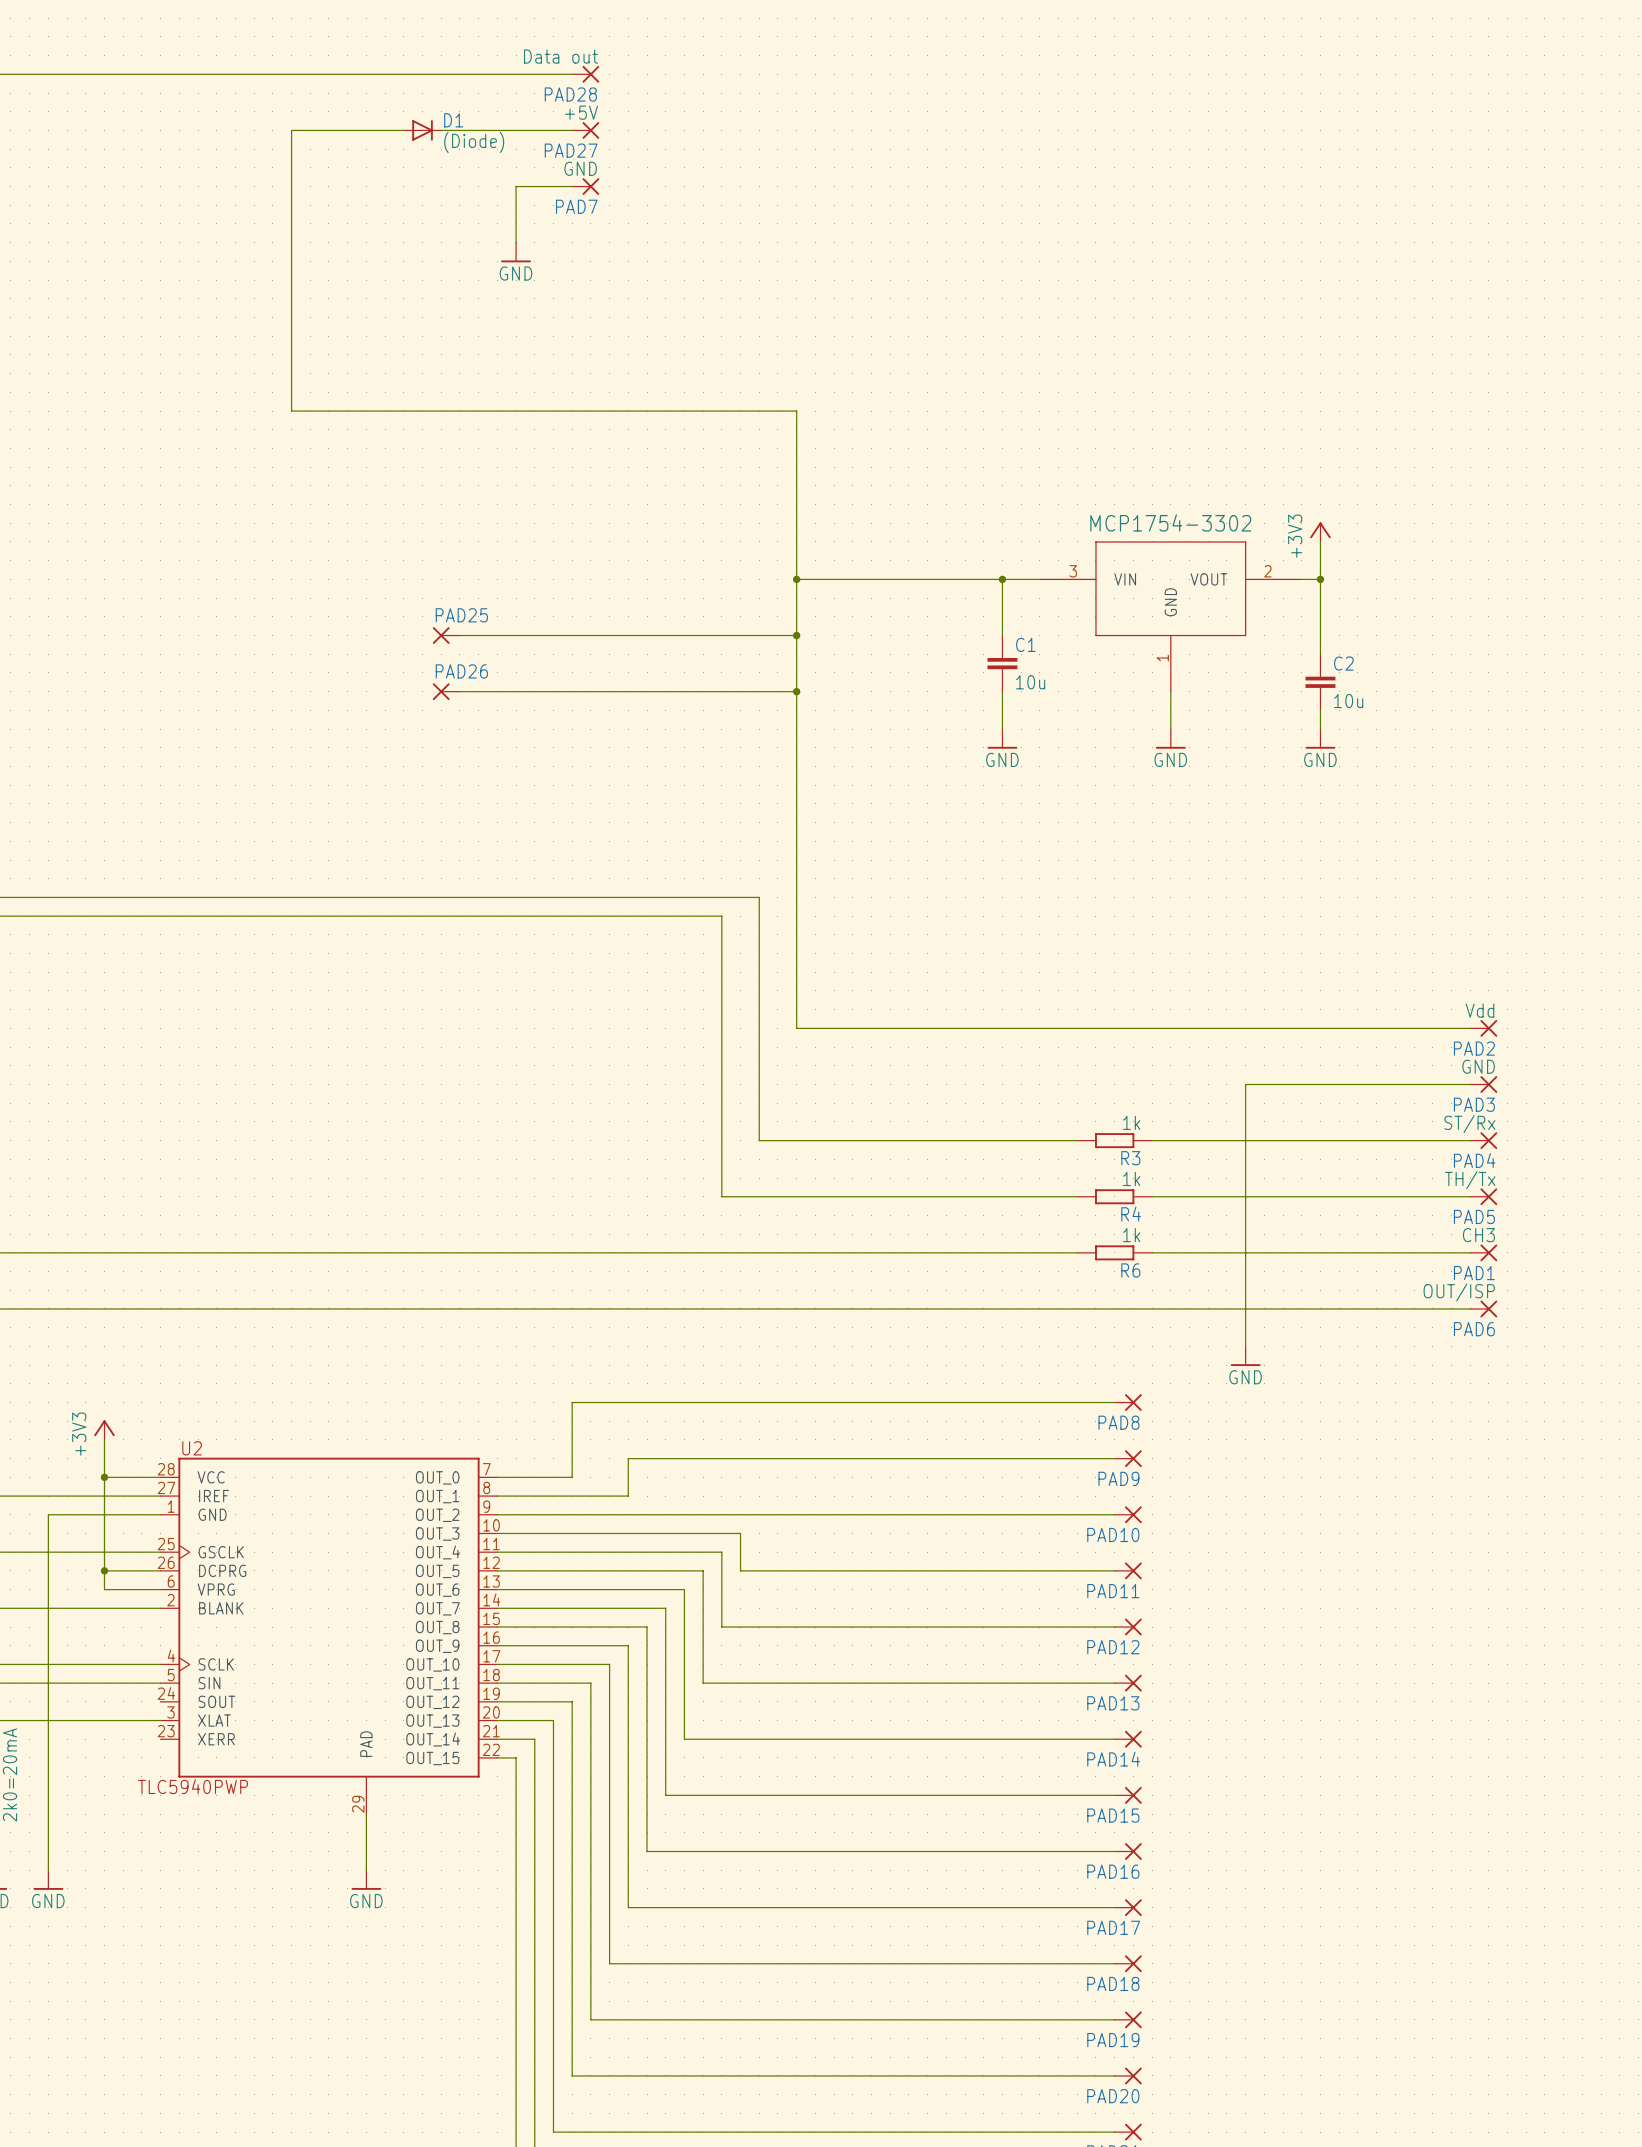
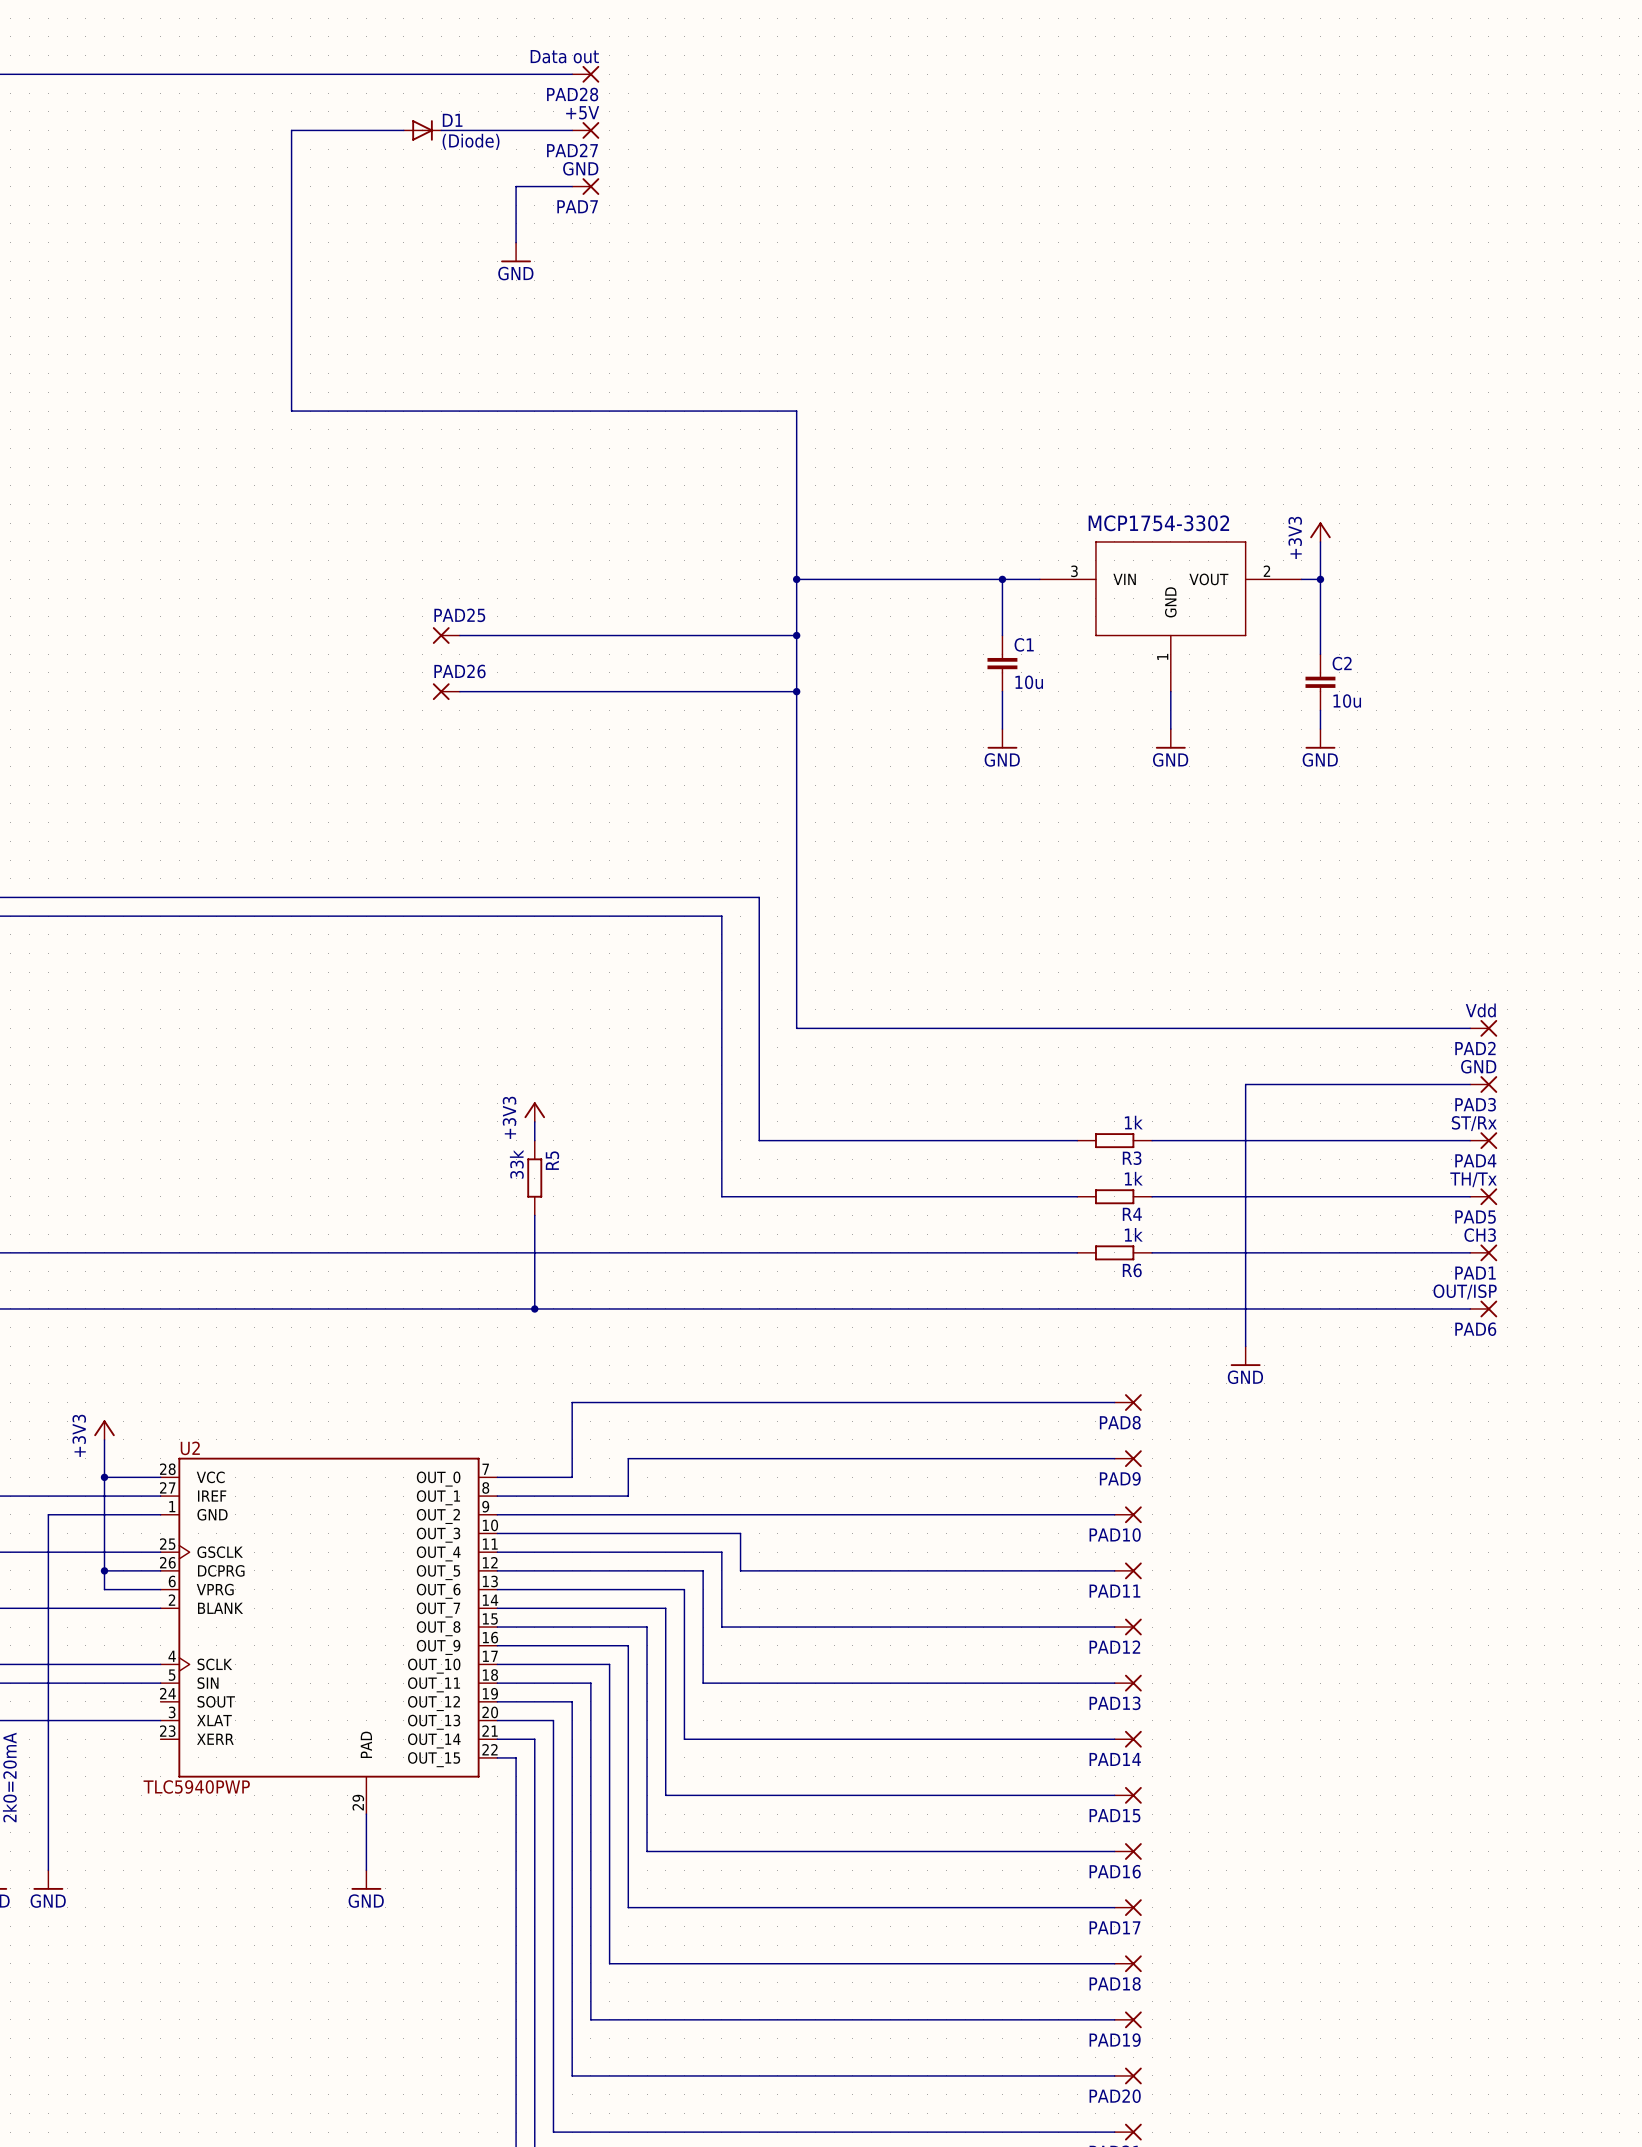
power symbol: none -> +3V3 (534, 1112)
wire: none -> (534, 1121) (534, 1140)
R5: none -> 33k (534, 1178)
wire: none -> (534, 1215) (534, 1308)
junction: none -> (534, 1308)

